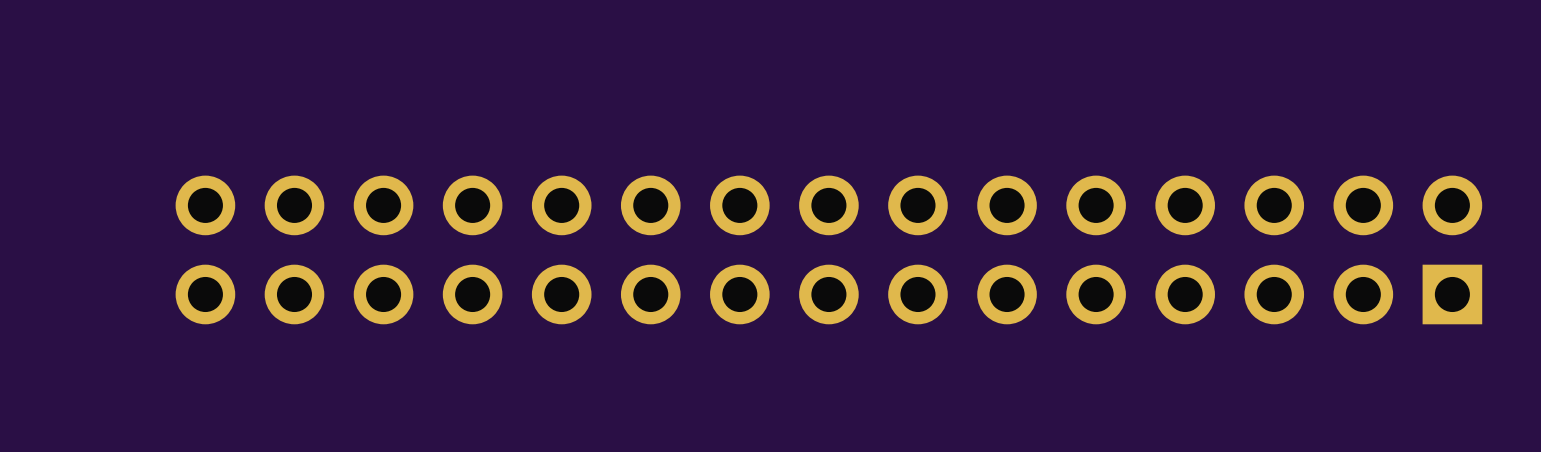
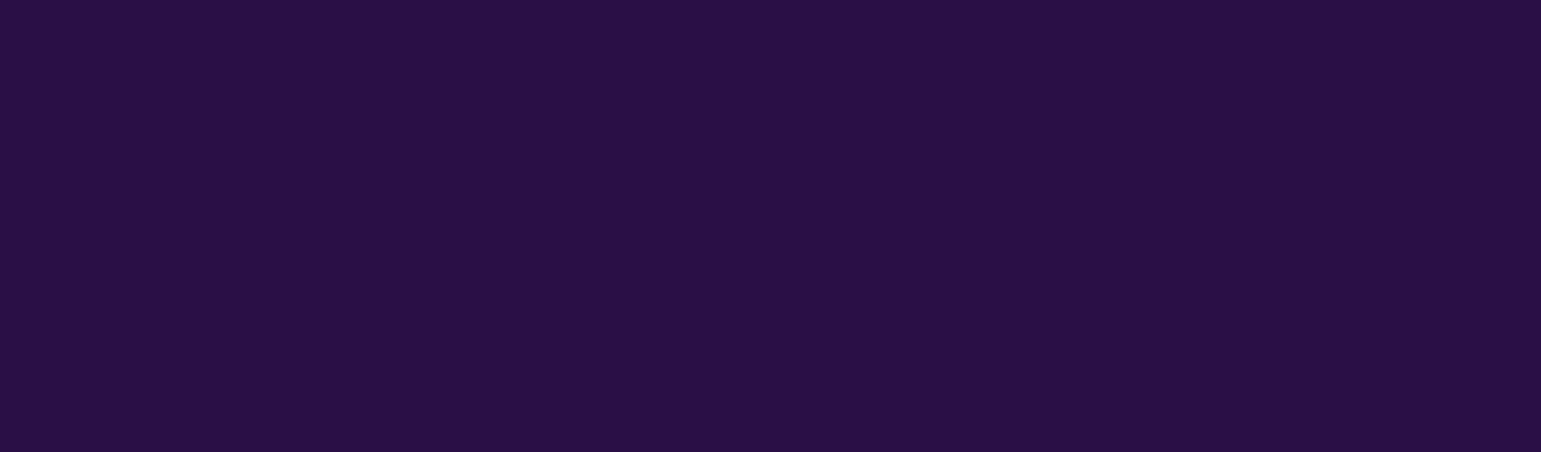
part: (828, 249) -> none

